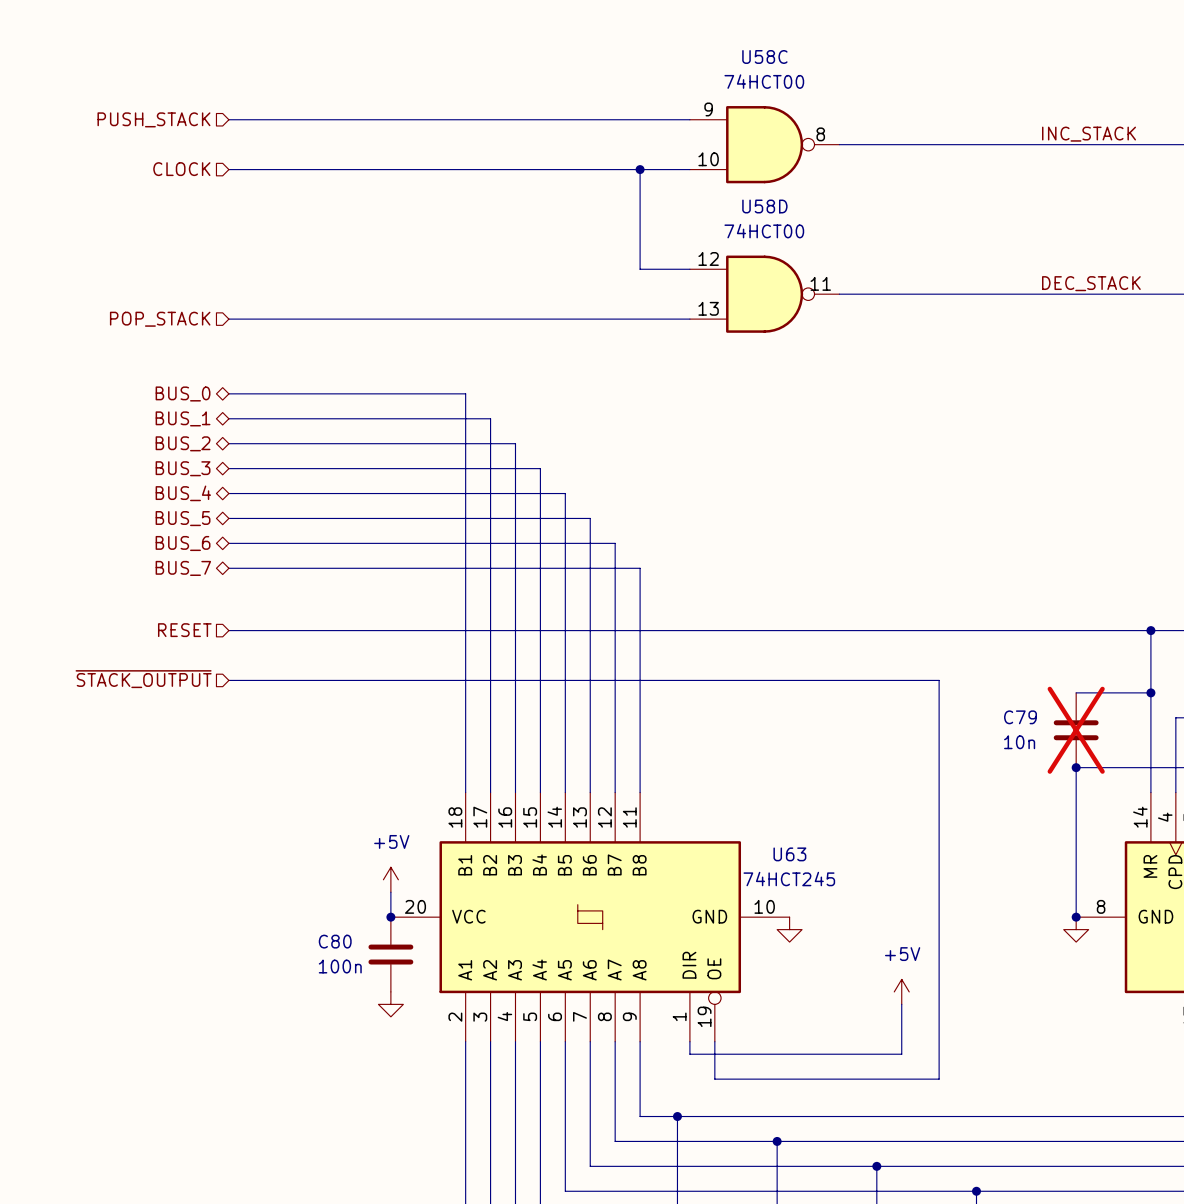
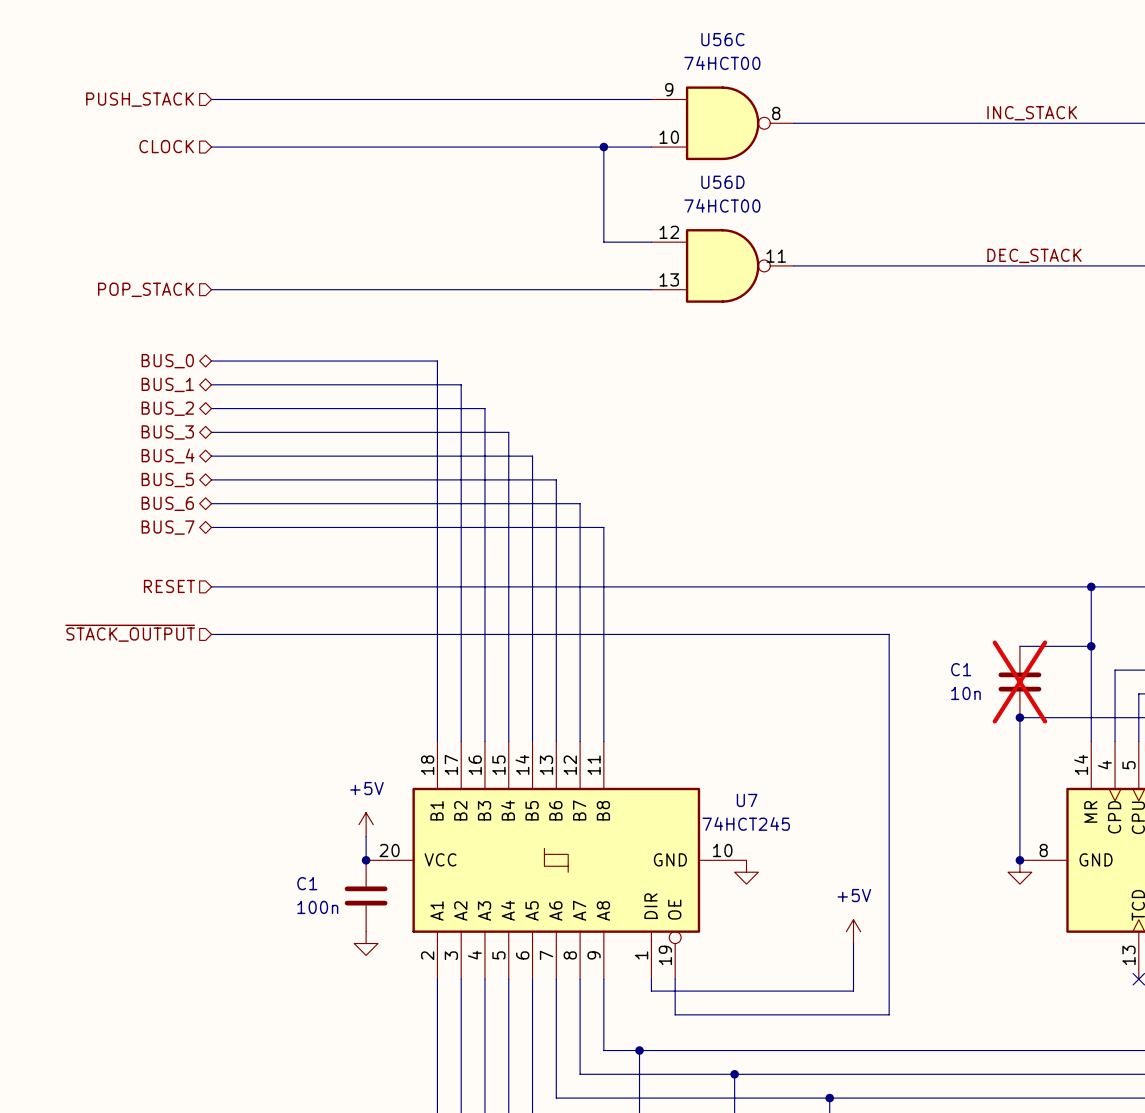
U58C name: U58C (764, 56) -> U56C (722, 39)
U58D name: U58D (764, 206) -> U56D (722, 182)
C79 name: C79 (1020, 717) -> C1 (961, 669)
U63 name: U63 (789, 854) -> U7 (747, 800)
C80 name: C80 (335, 941) -> C1 (307, 883)

